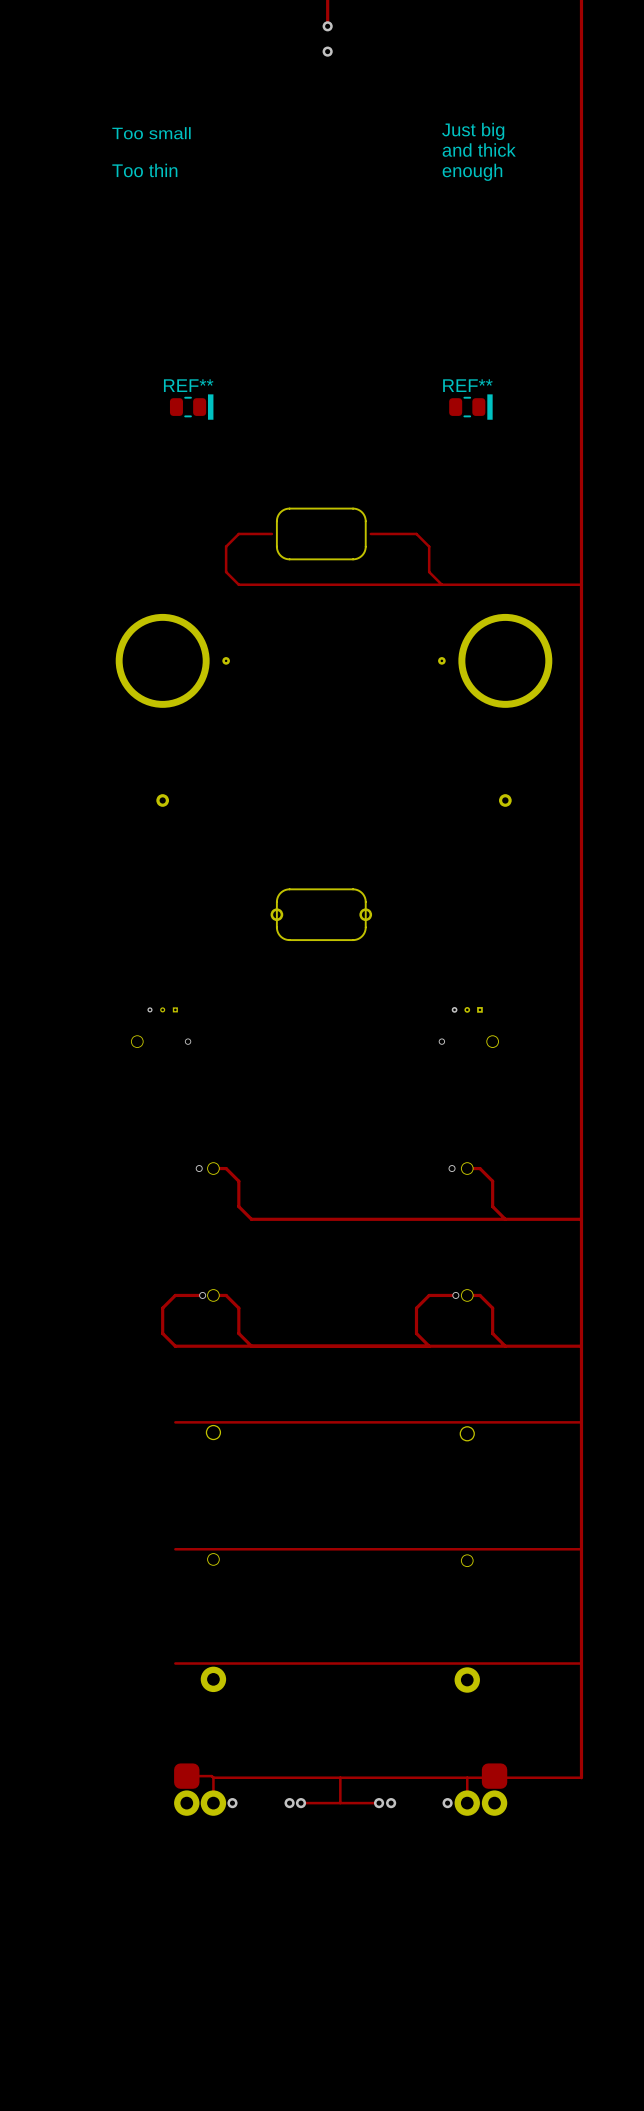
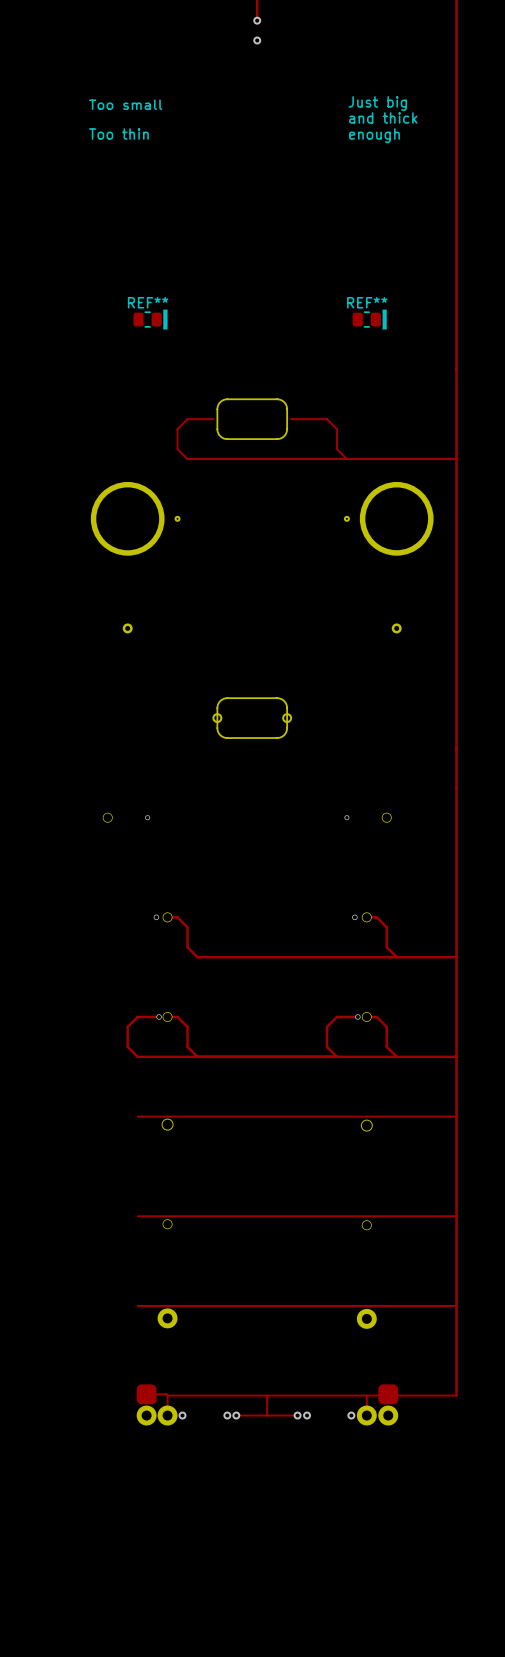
via: (149, 1009) -> none
part: (162, 1009) -> none
part: (175, 1009) -> none
via: (454, 1009) -> none
part: (467, 1009) -> none
part: (479, 1009) -> none

